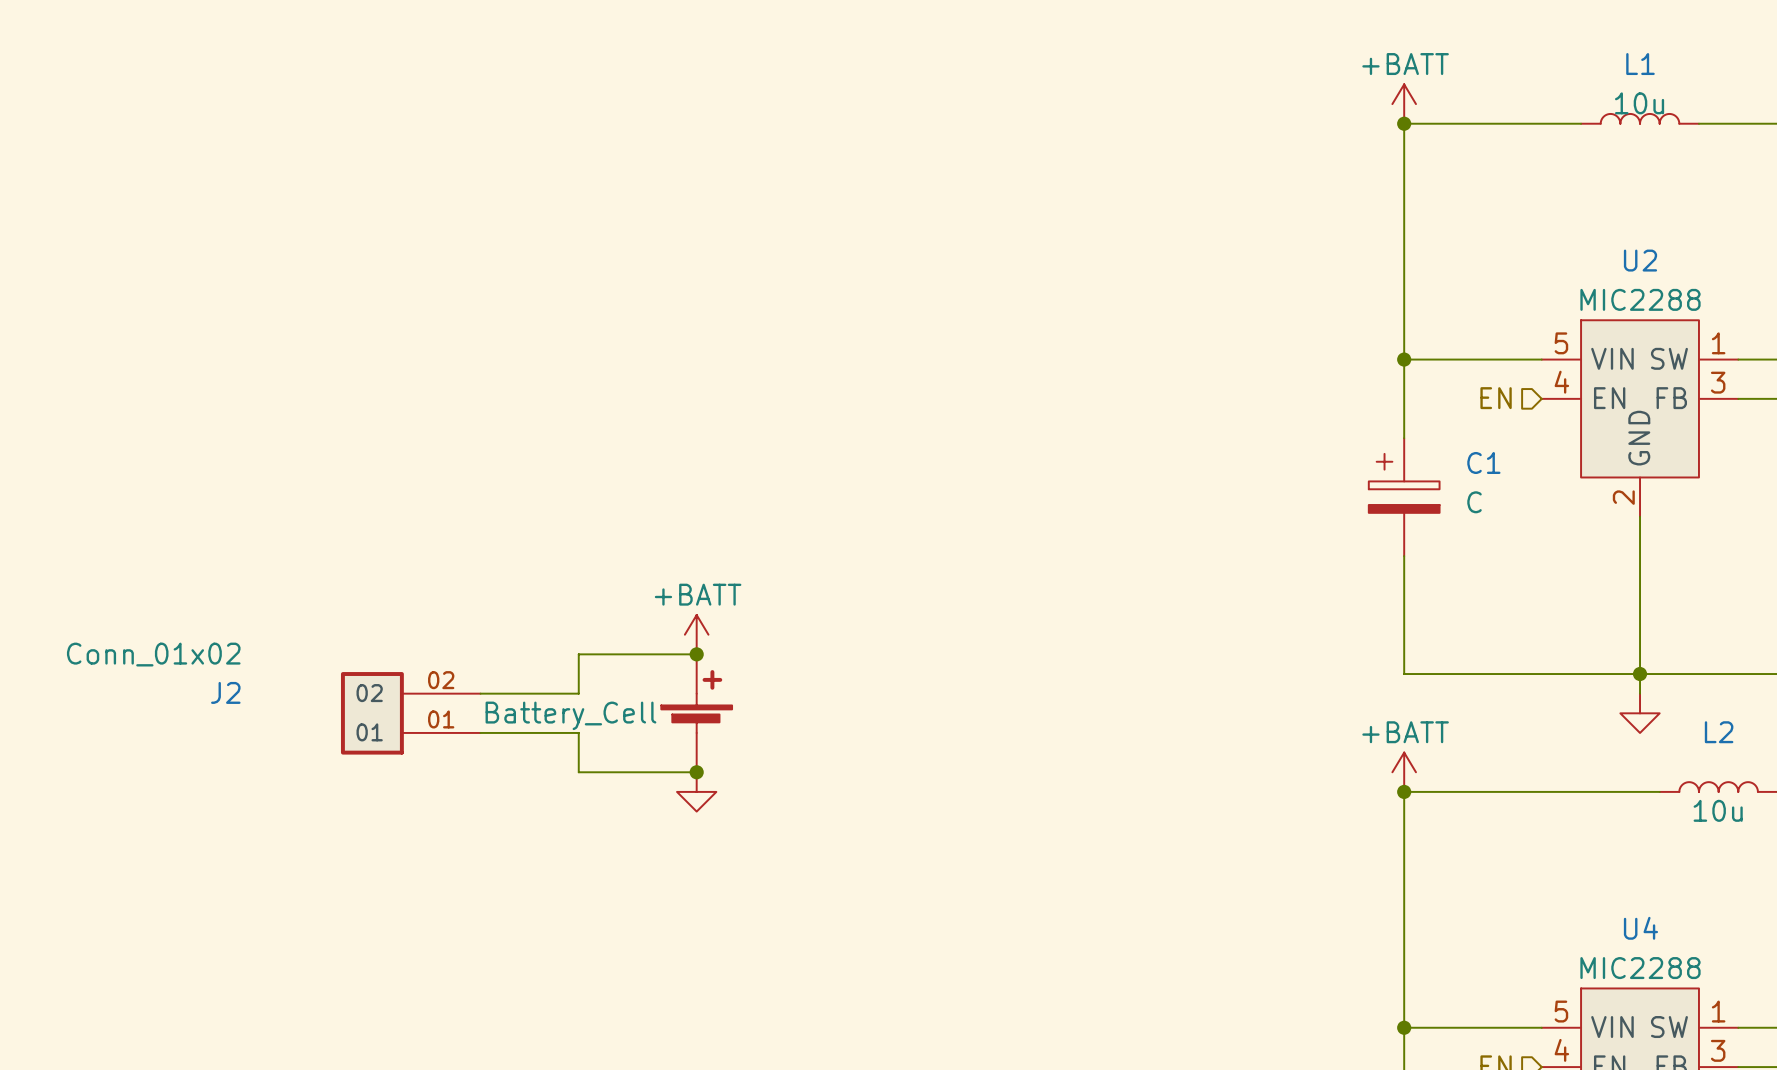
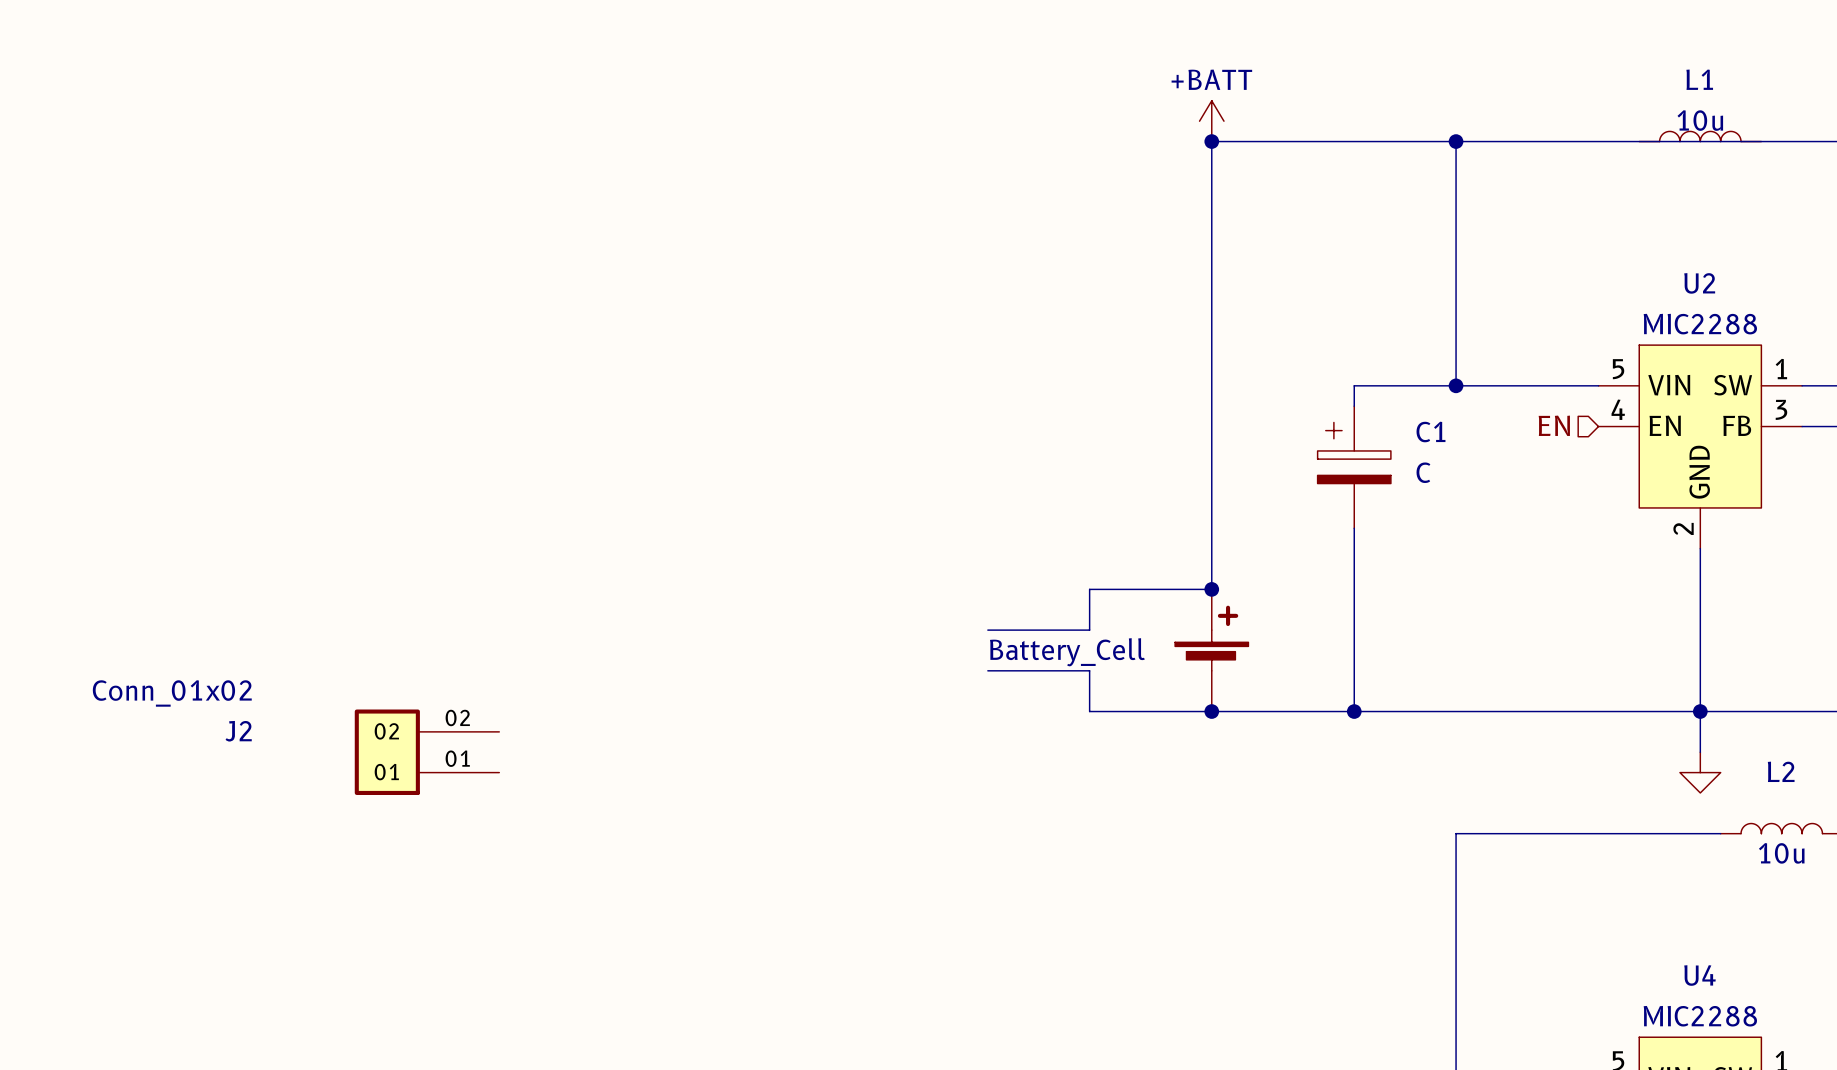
power symbol position: +BATT (1404, 104) -> +BATT (1211, 121)
junction: none -> (1211, 141)
wire: none -> (1456, 141) (1211, 141) (1211, 589) (1089, 589) (1089, 630) (987, 630)
wire: none -> (1639, 141) (1761, 141)
wire: (1404, 359) (1404, 438) -> (1456, 385) (1354, 385) (1354, 406)
wire: none -> (1354, 528) (1354, 711)
C1 position: (1404, 497) -> (1354, 467)
junction: none -> (1211, 589)
wire: (1404, 556) (1404, 674) -> (987, 670) (1089, 670) (1089, 711) (1456, 711)
part: none -> Battery_Cell (1211, 650)
power symbol: +BATT (696, 634) -> none
wire: (696, 654) (578, 654) (578, 693) (480, 693) -> none
junction: (696, 654) -> none
junction: none -> (1211, 711)
junction: none -> (1354, 711)
part: Battery_Cell (696, 713) -> none
power symbol position: (1640, 713) -> (1700, 772)
wire: (480, 732) (578, 732) (578, 772) (696, 772) -> none
junction: (696, 772) -> none
power symbol: +BATT (1404, 772) -> none
power symbol: (696, 791) -> none
junction: (1404, 791) -> none

